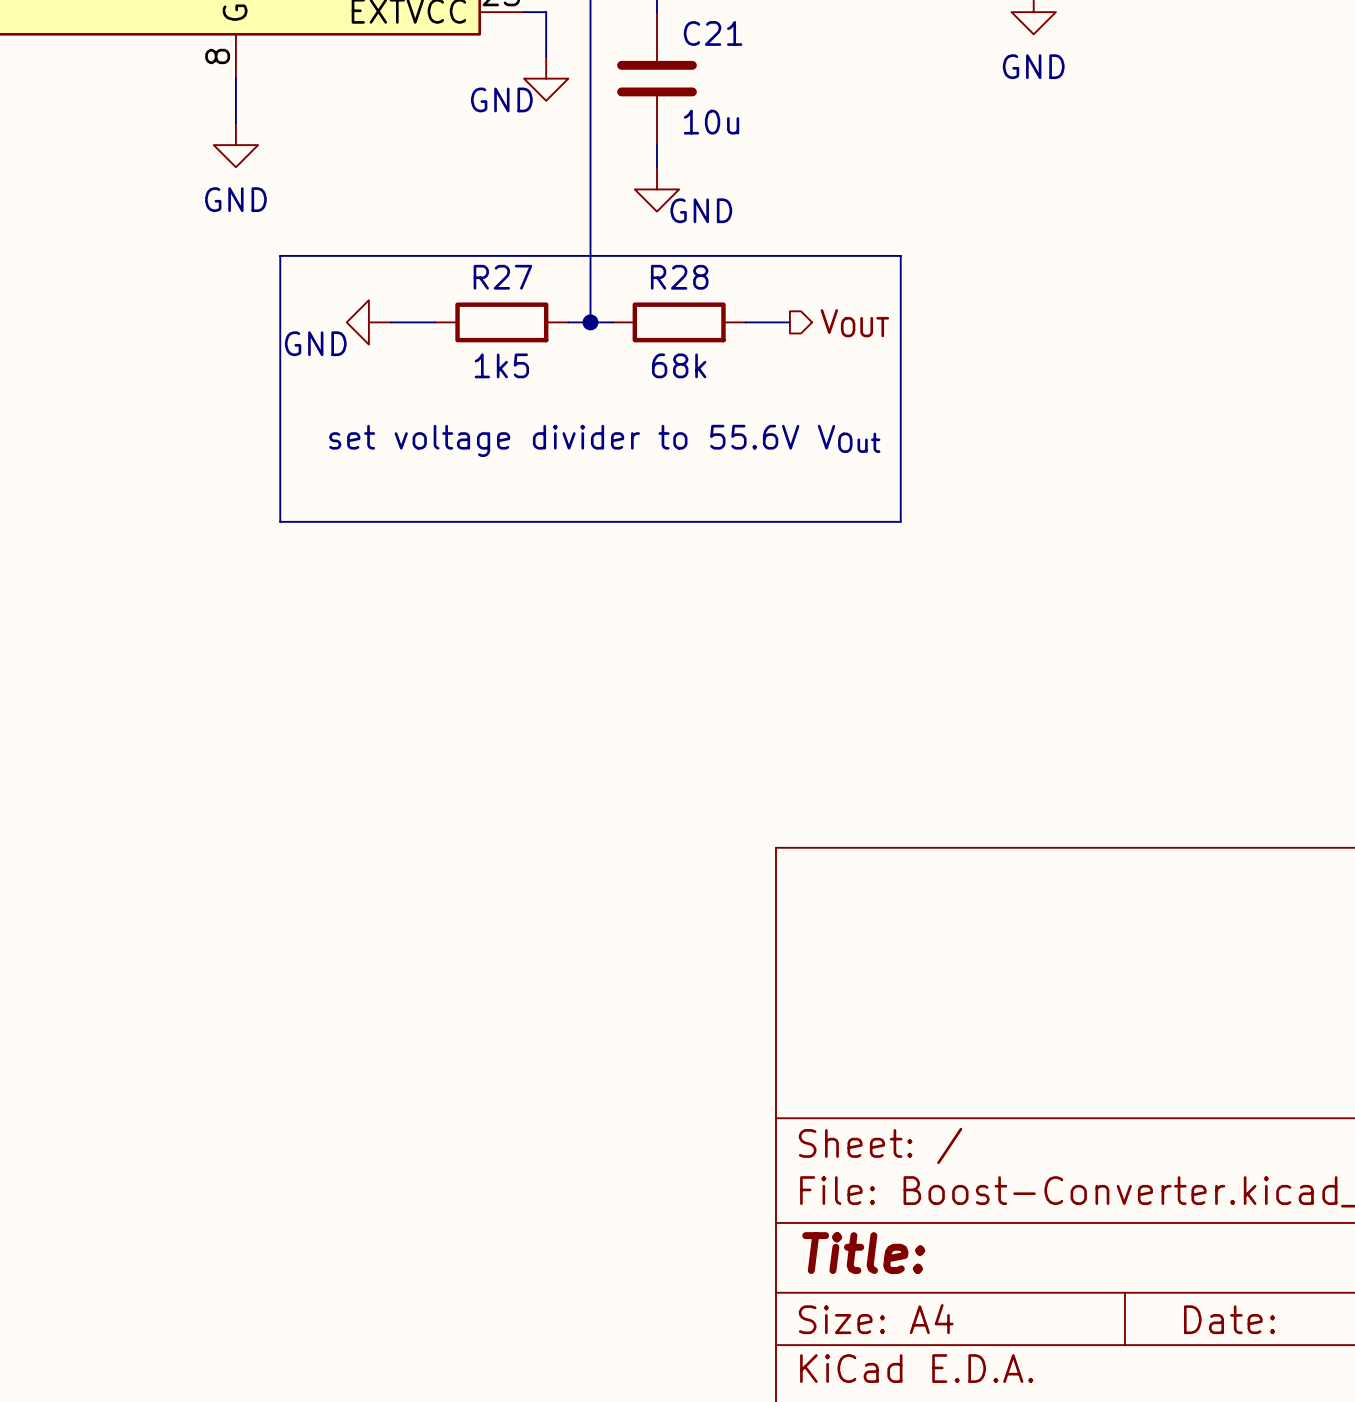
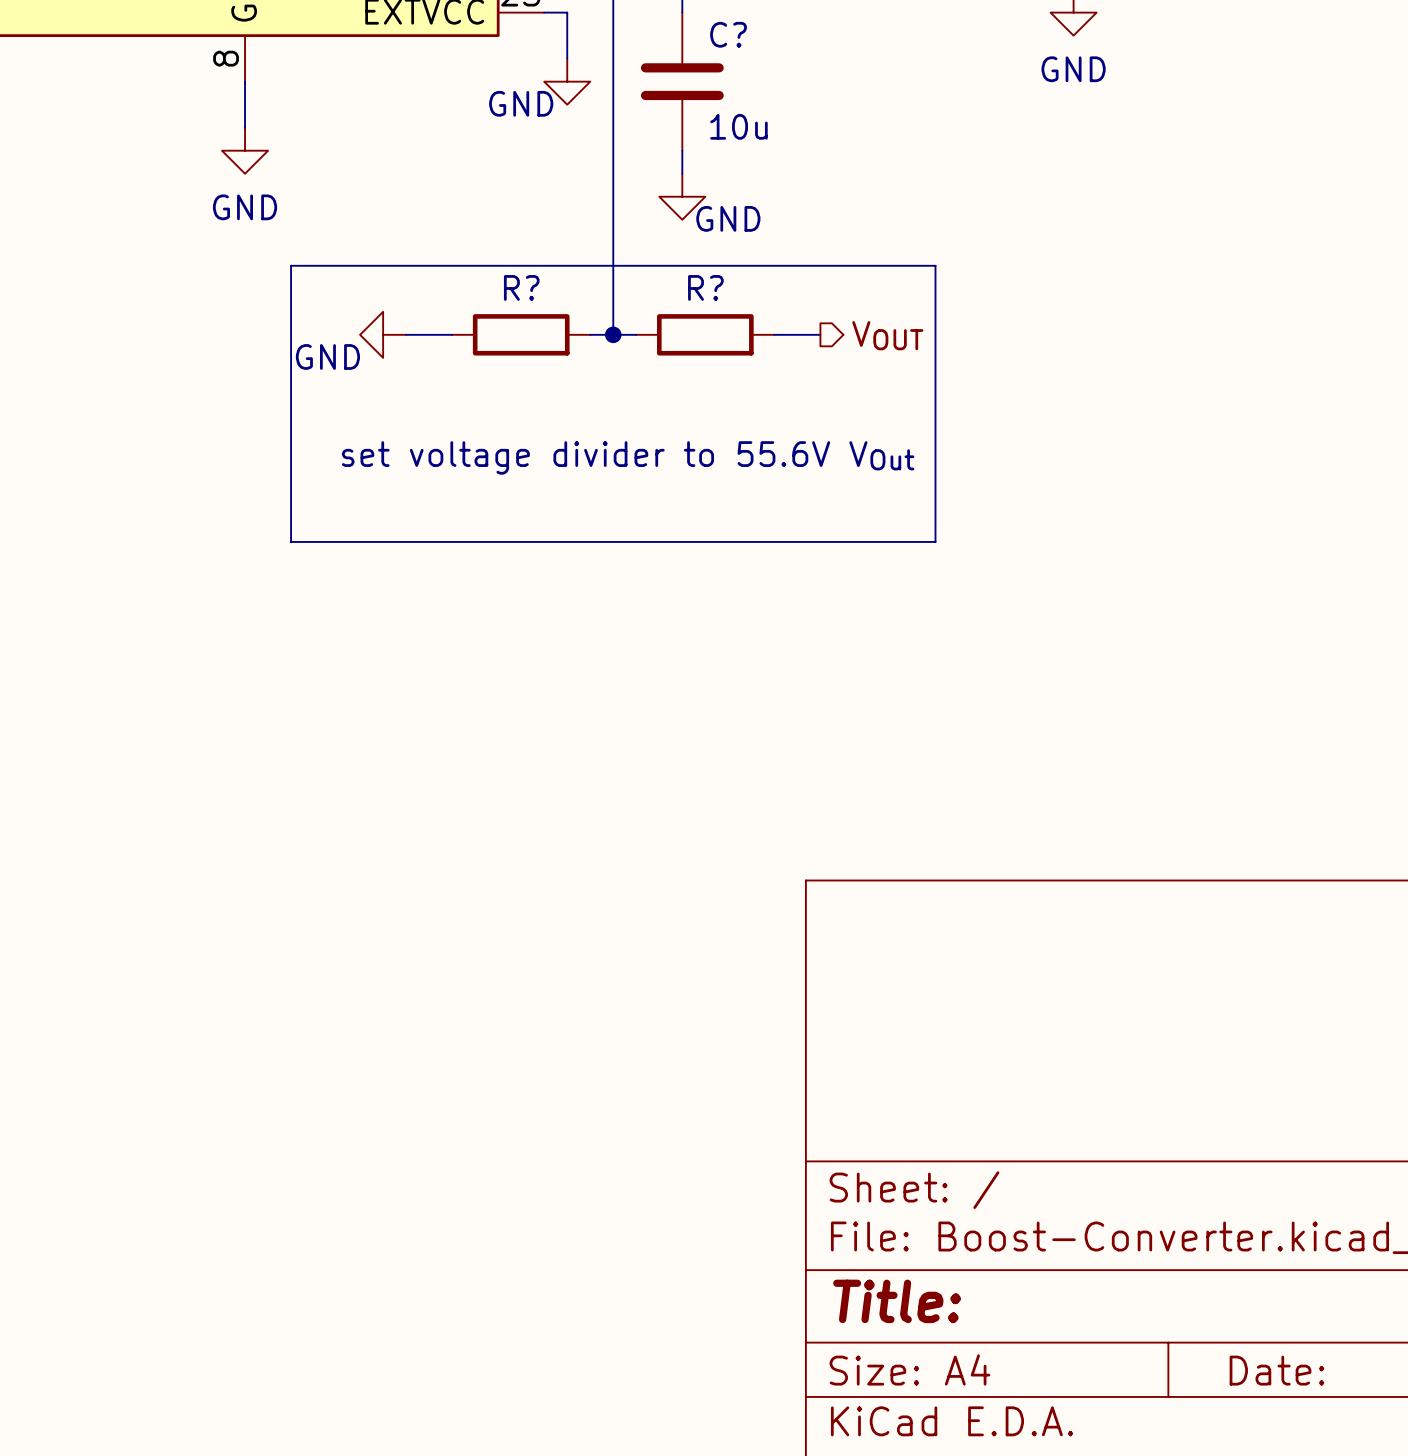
C21 name: C21 (713, 33) -> C? (728, 34)
R27 name: R27 (502, 277) -> R? (521, 287)
R28 name: R28 (679, 277) -> R? (705, 287)
R27 value: 1k5 (501, 365) -> none
R28 value: 68k (679, 365) -> none

